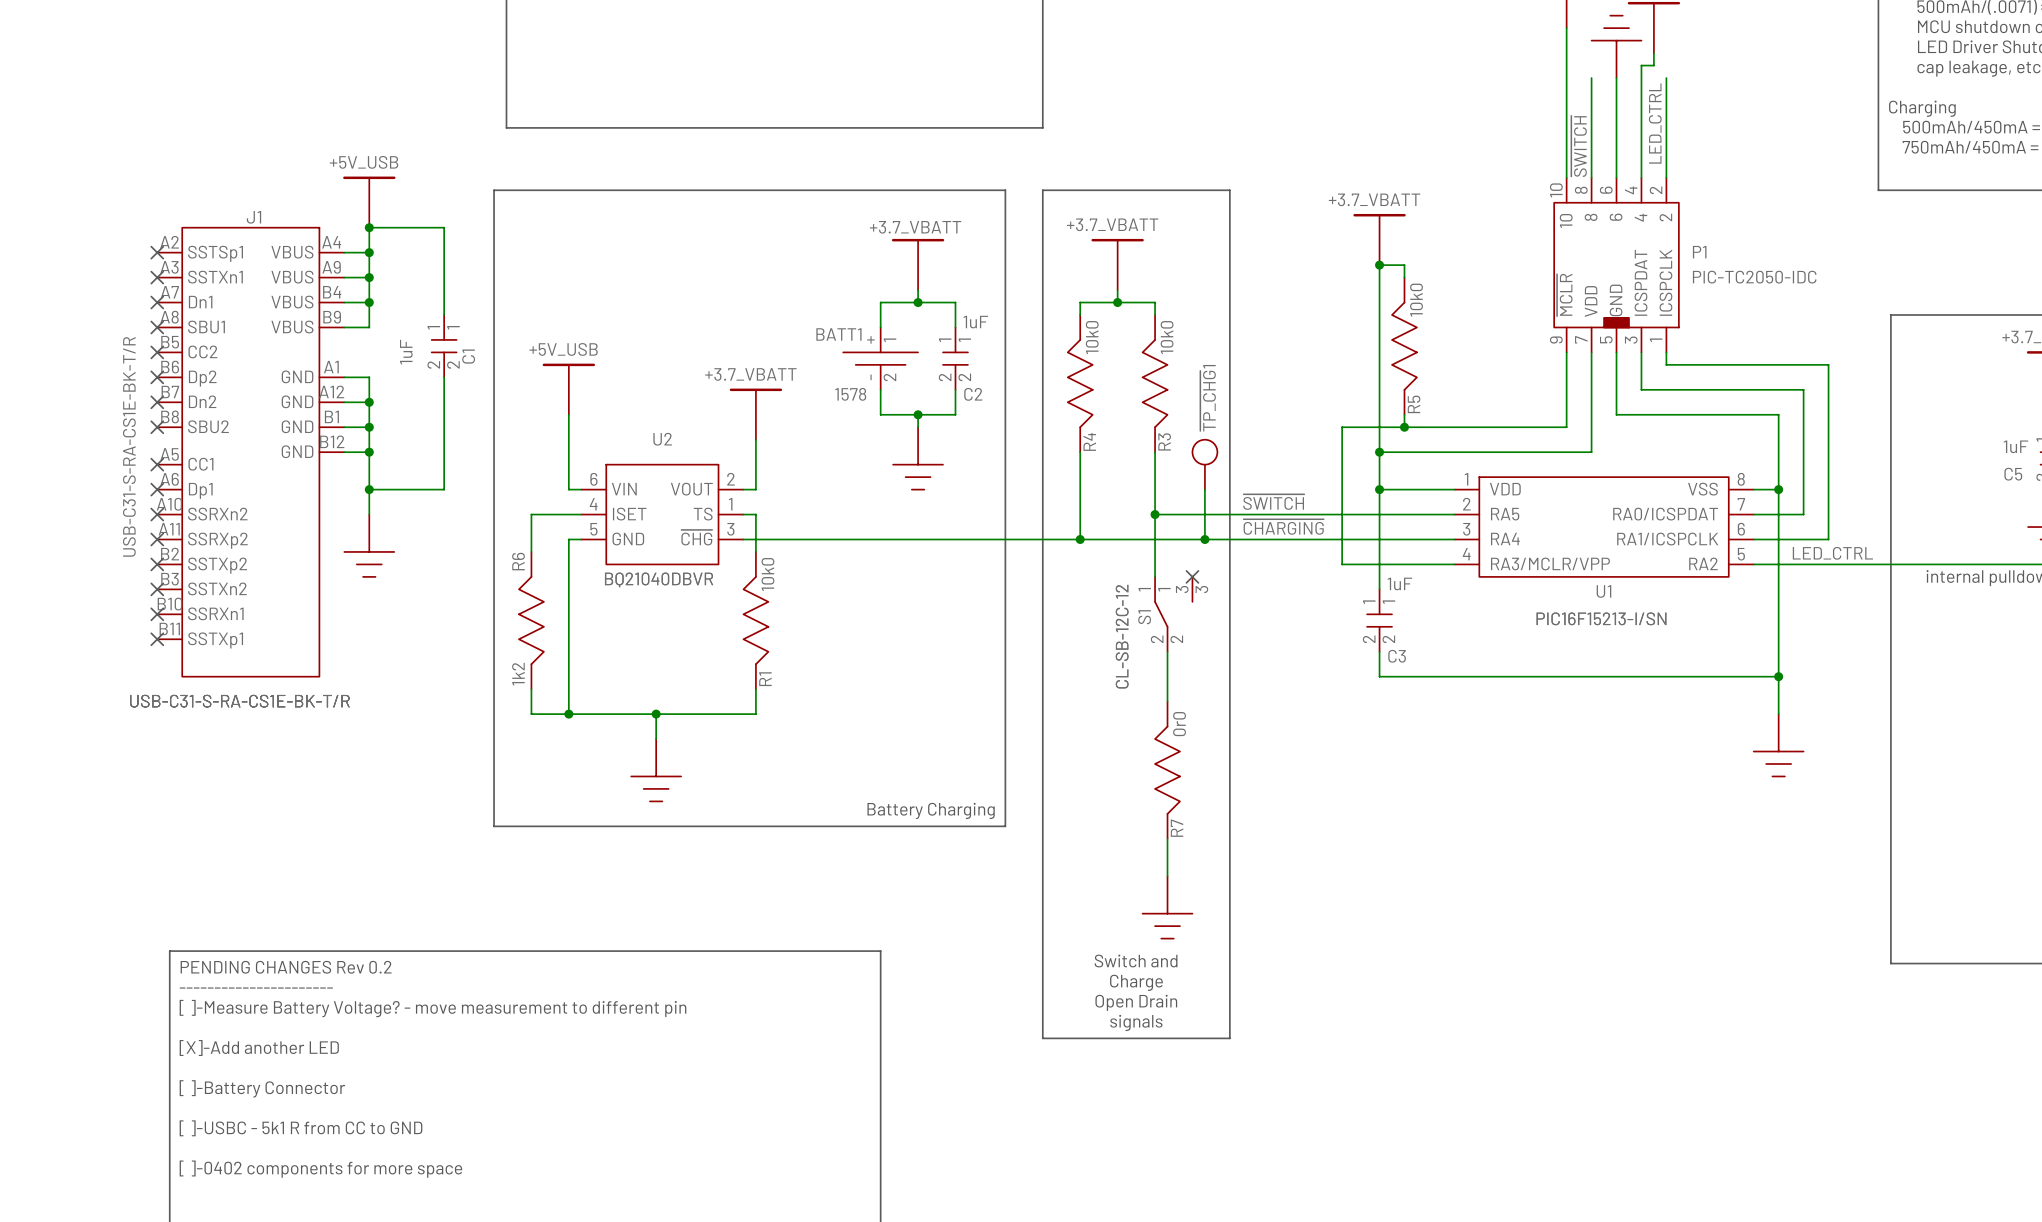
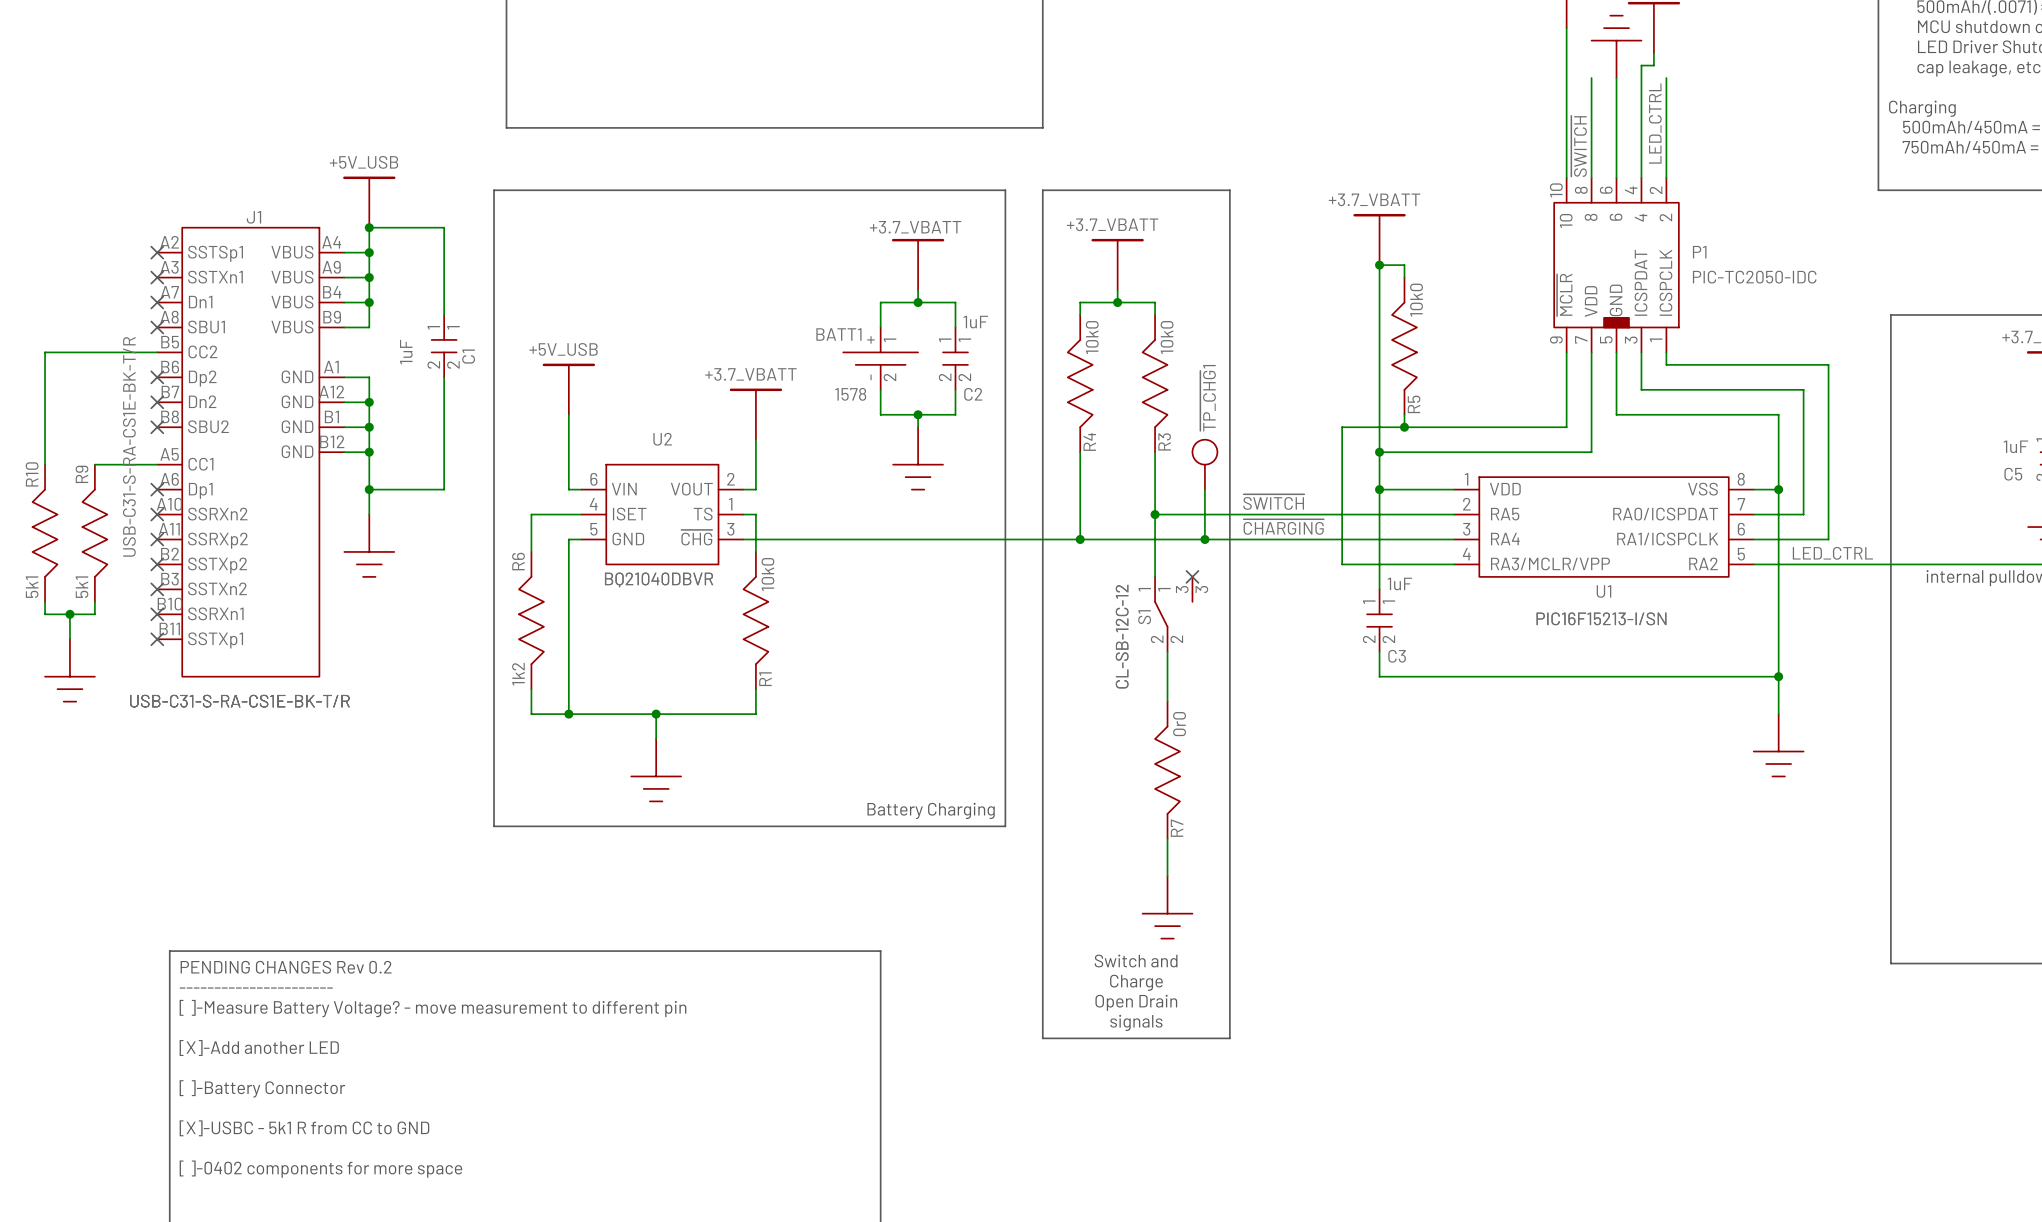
wire: none -> (157, 352) (45, 352) (45, 464)
no-connect mark: (157, 352) -> none
wire: none -> (94, 464) (157, 464)
no-connect mark: (157, 464) -> none
R10: none -> 5k1 (45, 533)
R9: none -> 5k1 (94, 533)
wire: none -> (45, 601) (45, 614) (94, 614) (94, 601)
wire: none -> (69, 614) (69, 639)
junction: none -> (69, 614)
power symbol: none -> (69, 670)
text: [ ]-USBC - 5k1 R from CC to GND (301, 1128) -> [X]-USBC - 5k1 R from CC to GND (304, 1128)

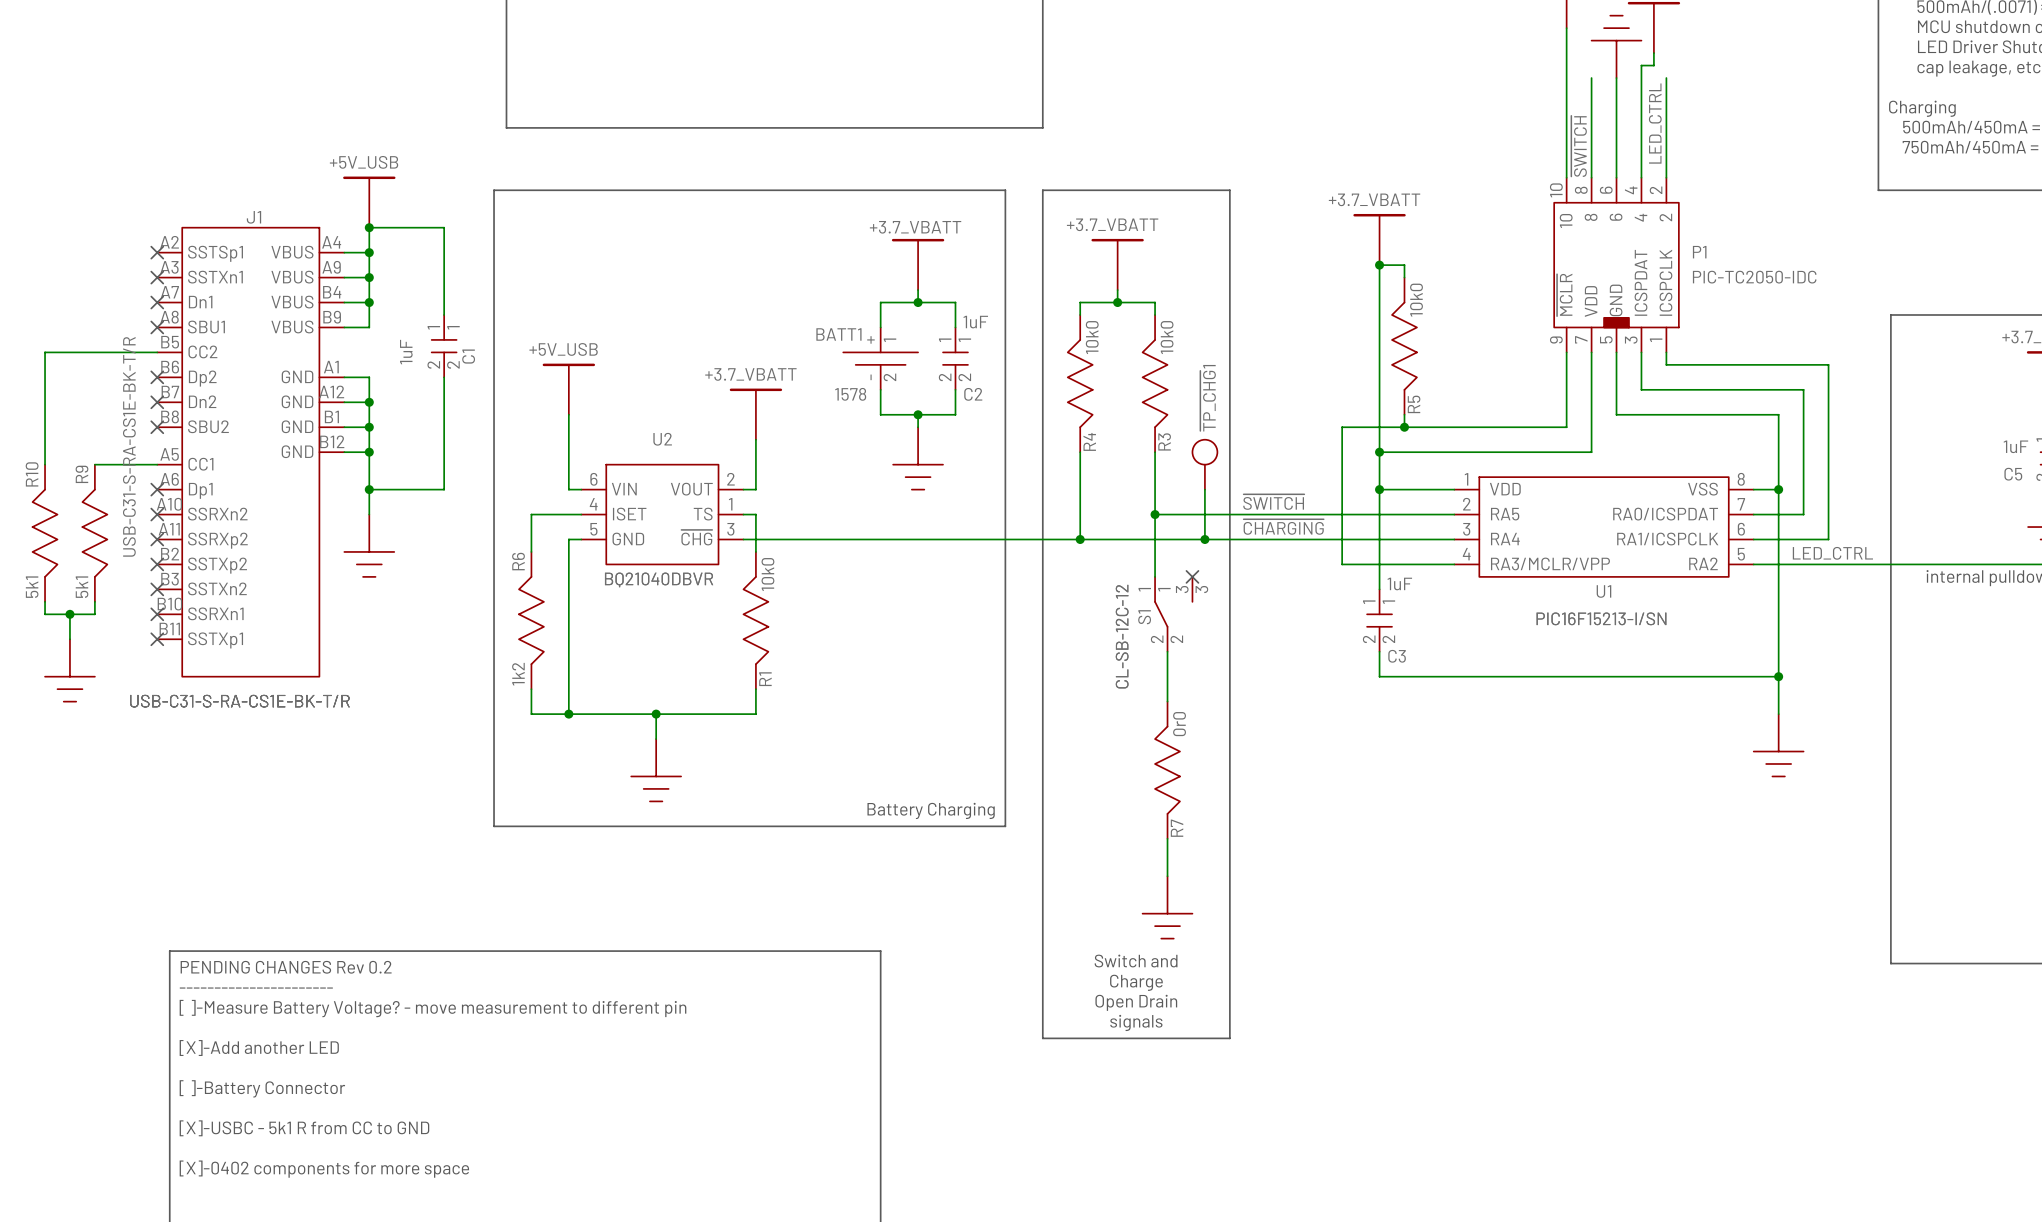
text: [ ]-0402 components for more space (320, 1169) -> [X]-0402 components for more space (324, 1169)

